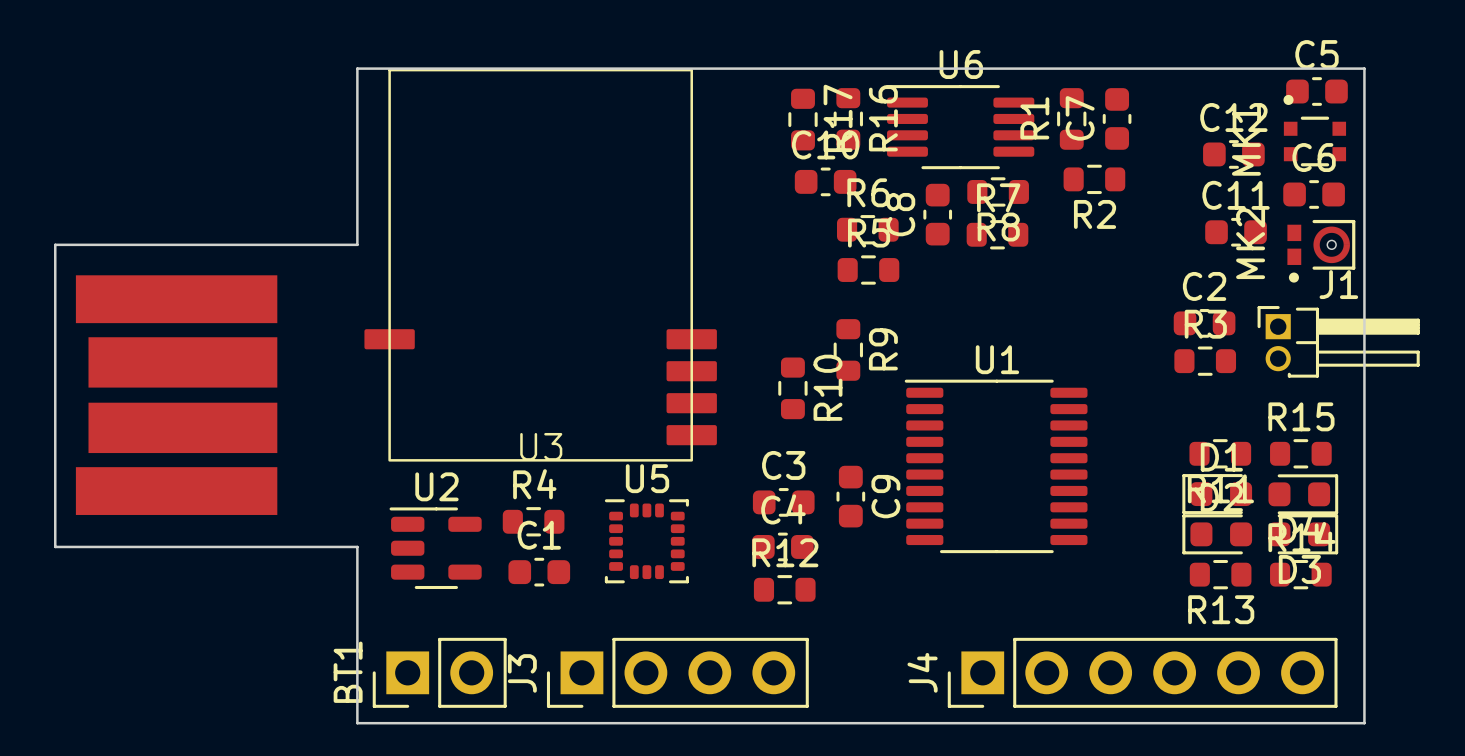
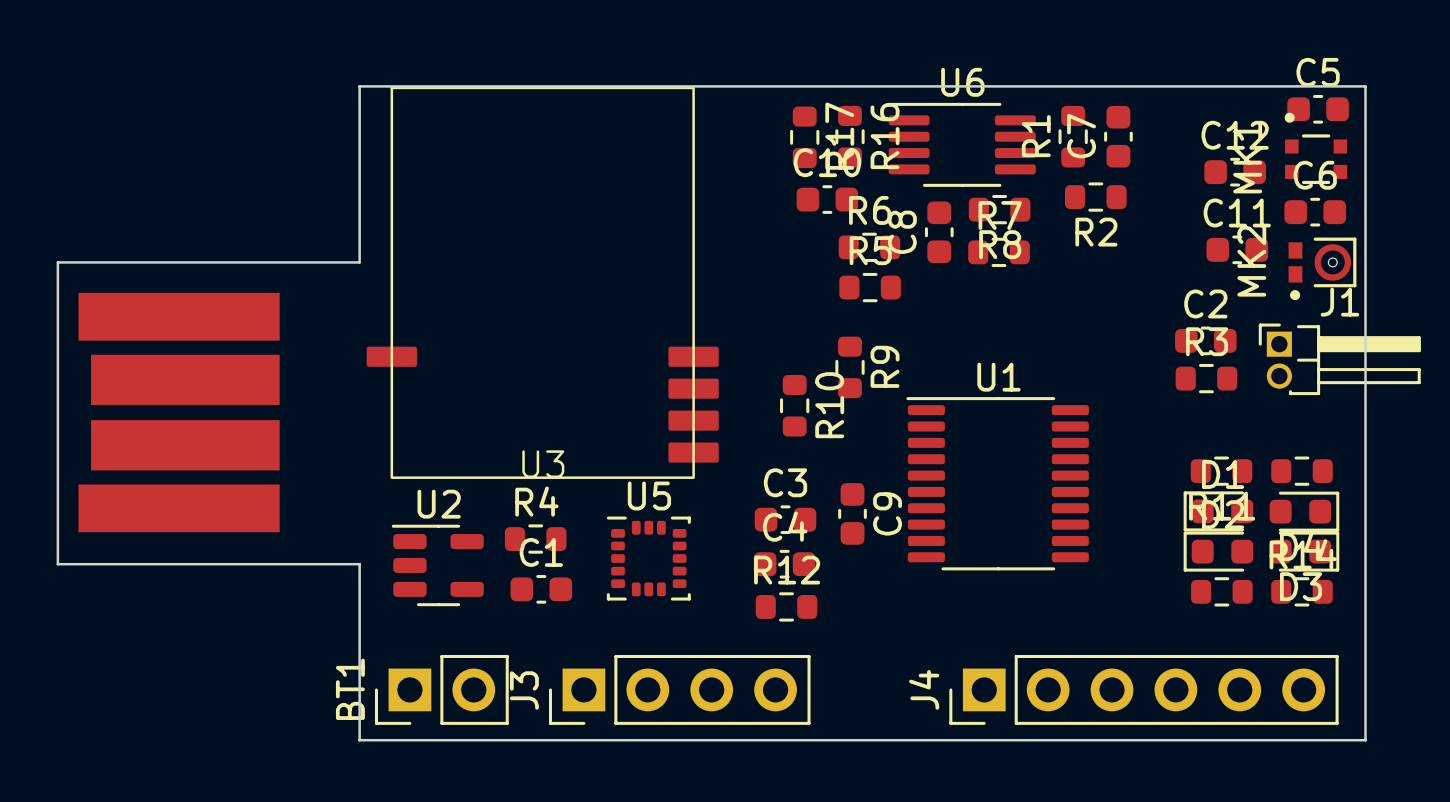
R15 name: R15 (1301, 416) -> none
R13 name: R13 (1221, 609) -> none

